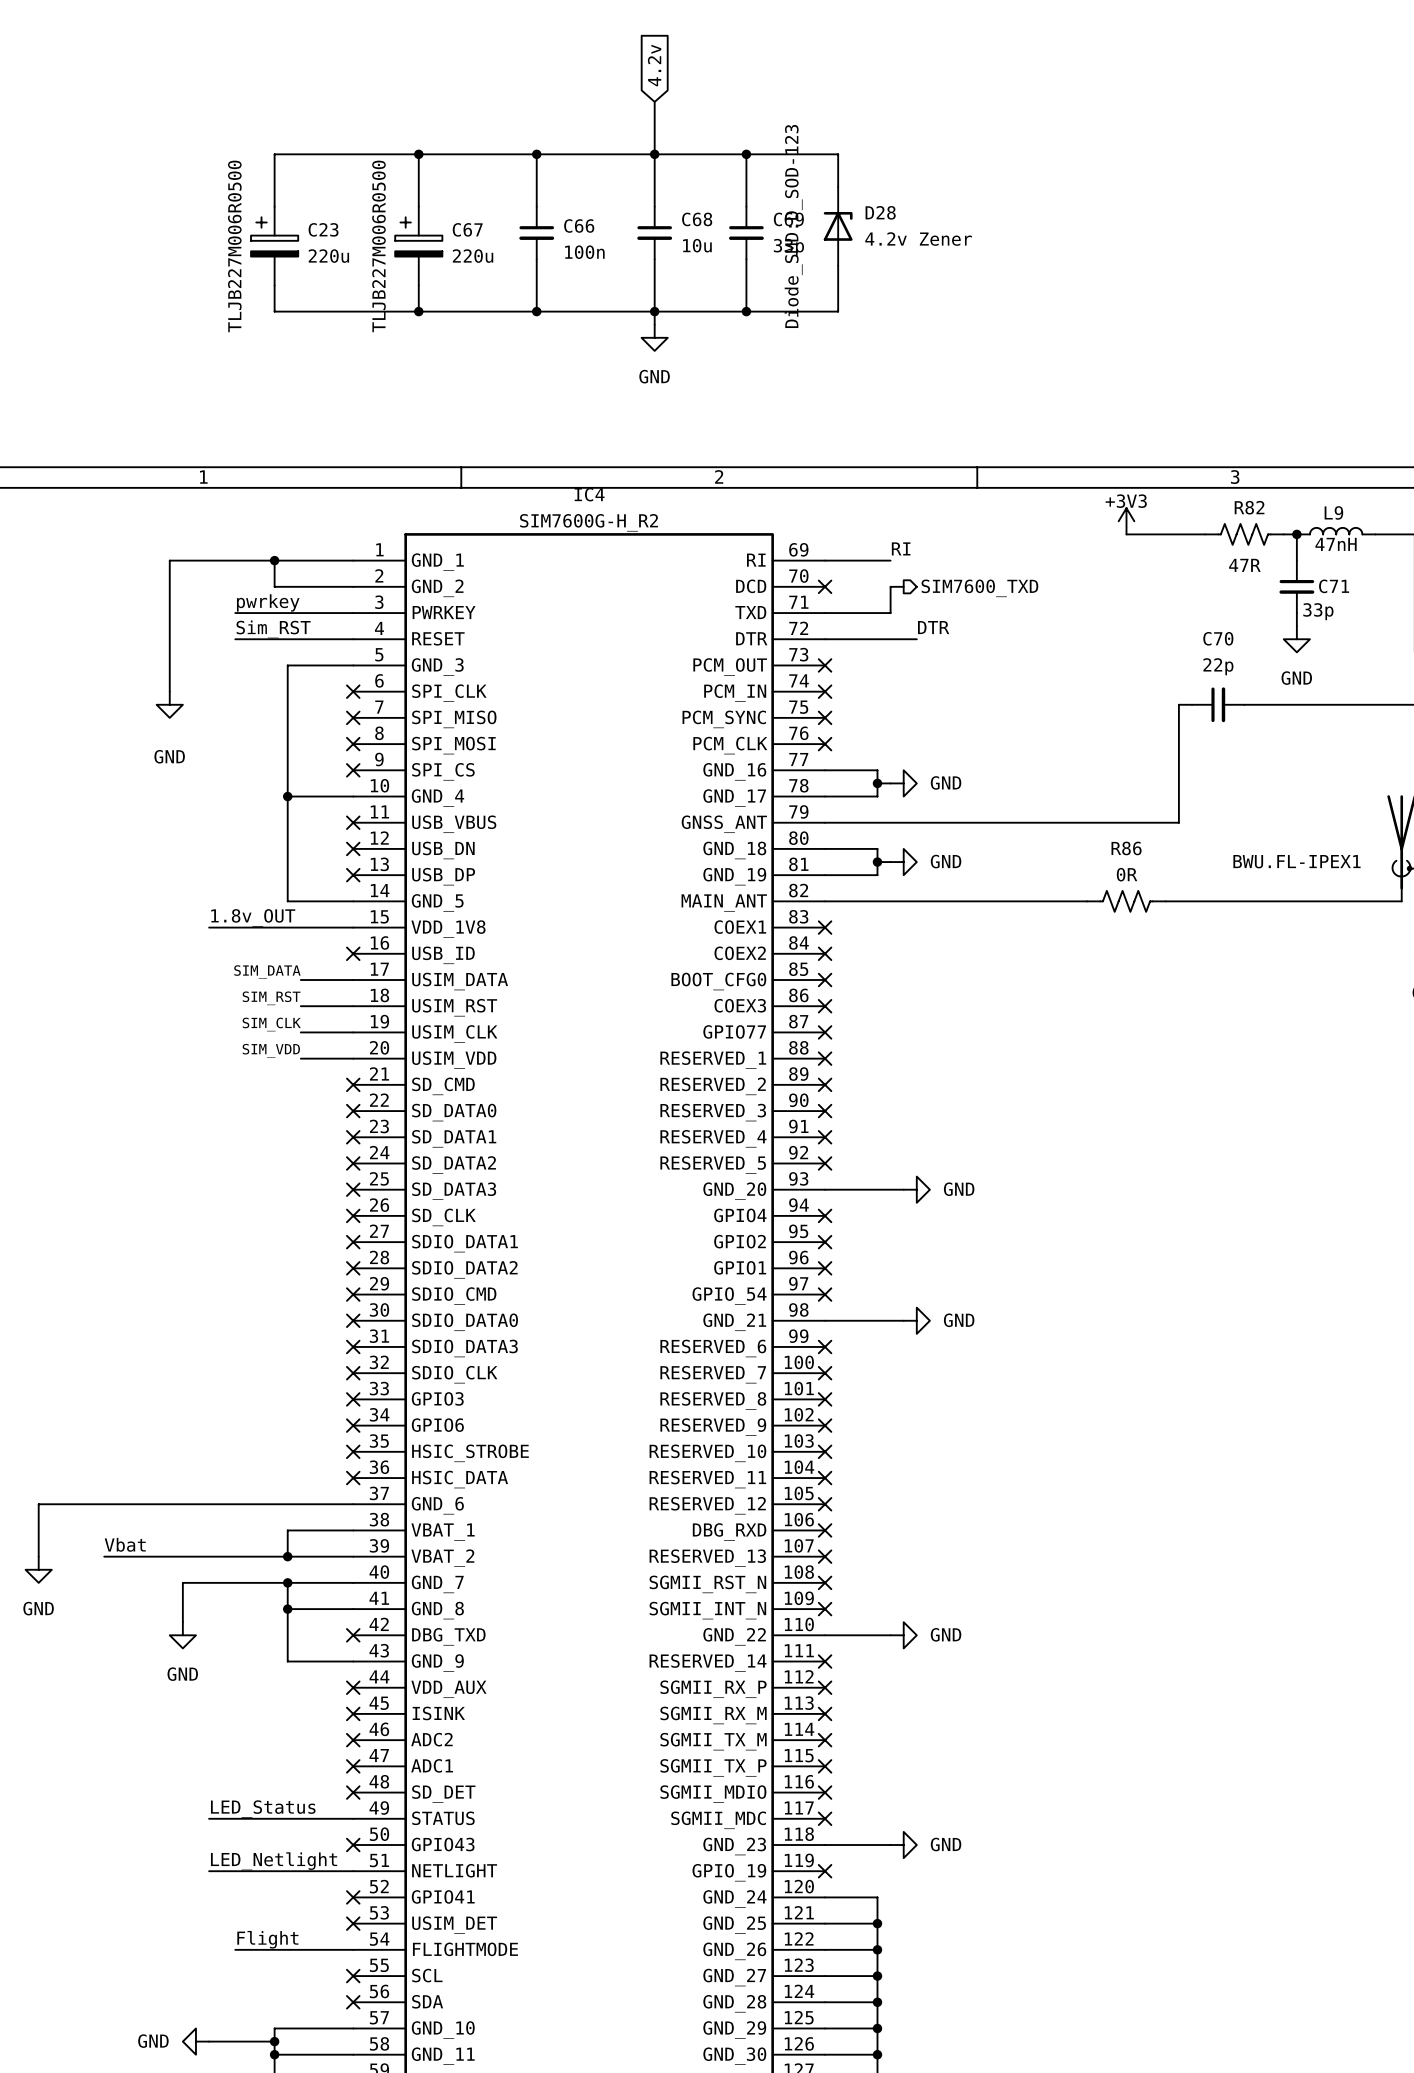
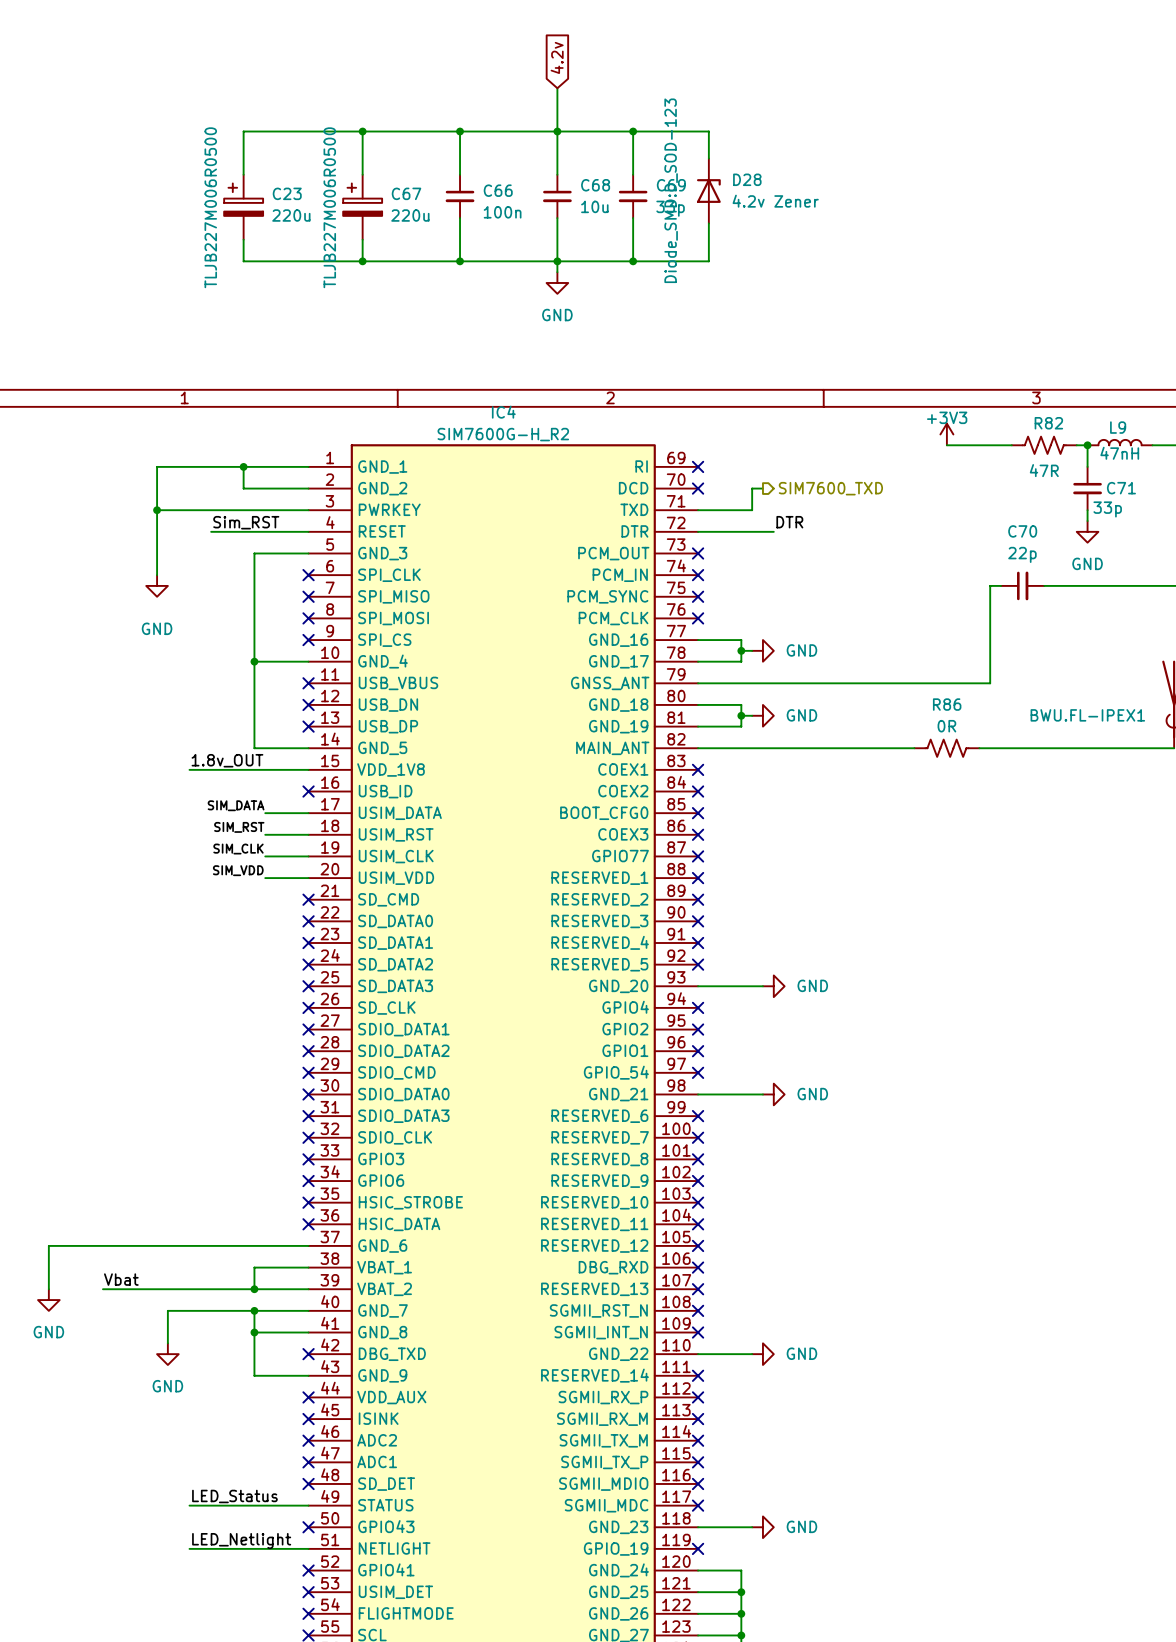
label: RI (901, 548) -> none
wire: (825, 560) (890, 560) -> none
no-connect mark: none -> (698, 466)
label: pwrkey (268, 602) -> none
wire: none -> (157, 510) (211, 510)
junction: none -> (157, 510)
label: Flight (267, 1939) -> none
wire: (235, 1949) (353, 1949) -> none
no-connect mark: none -> (308, 1613)

